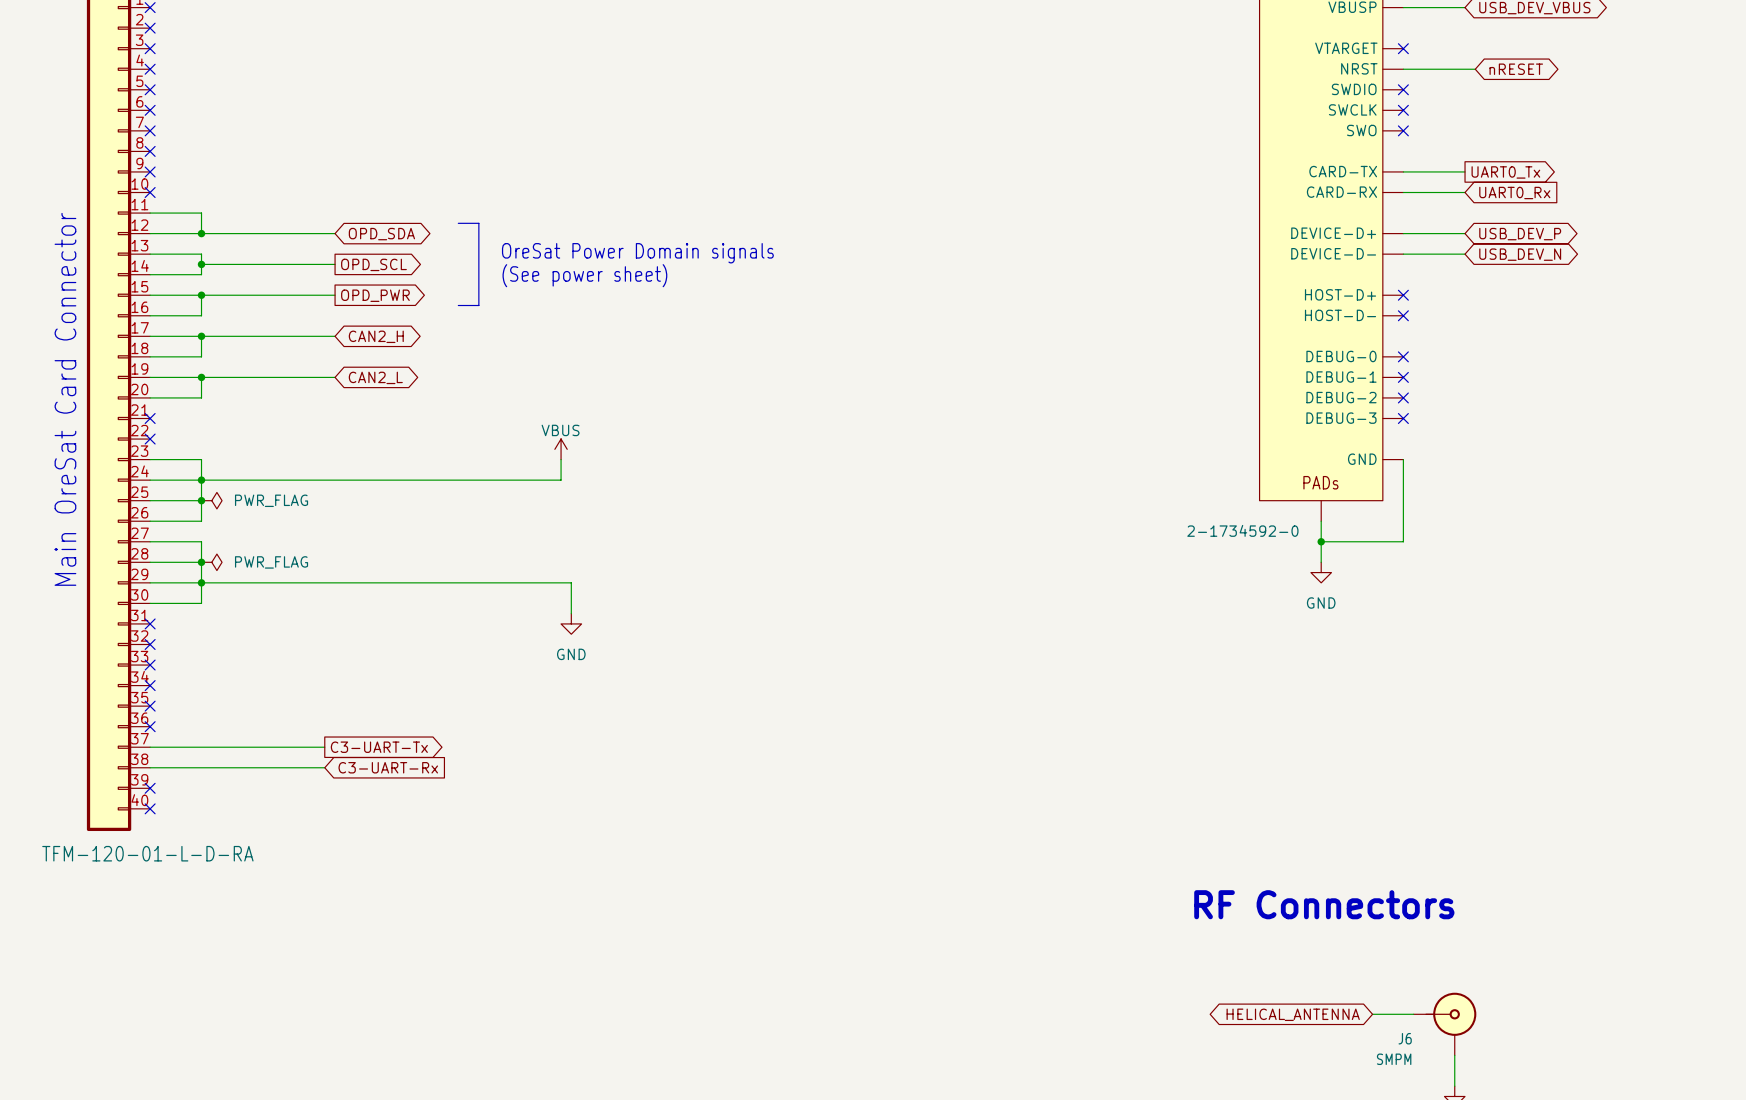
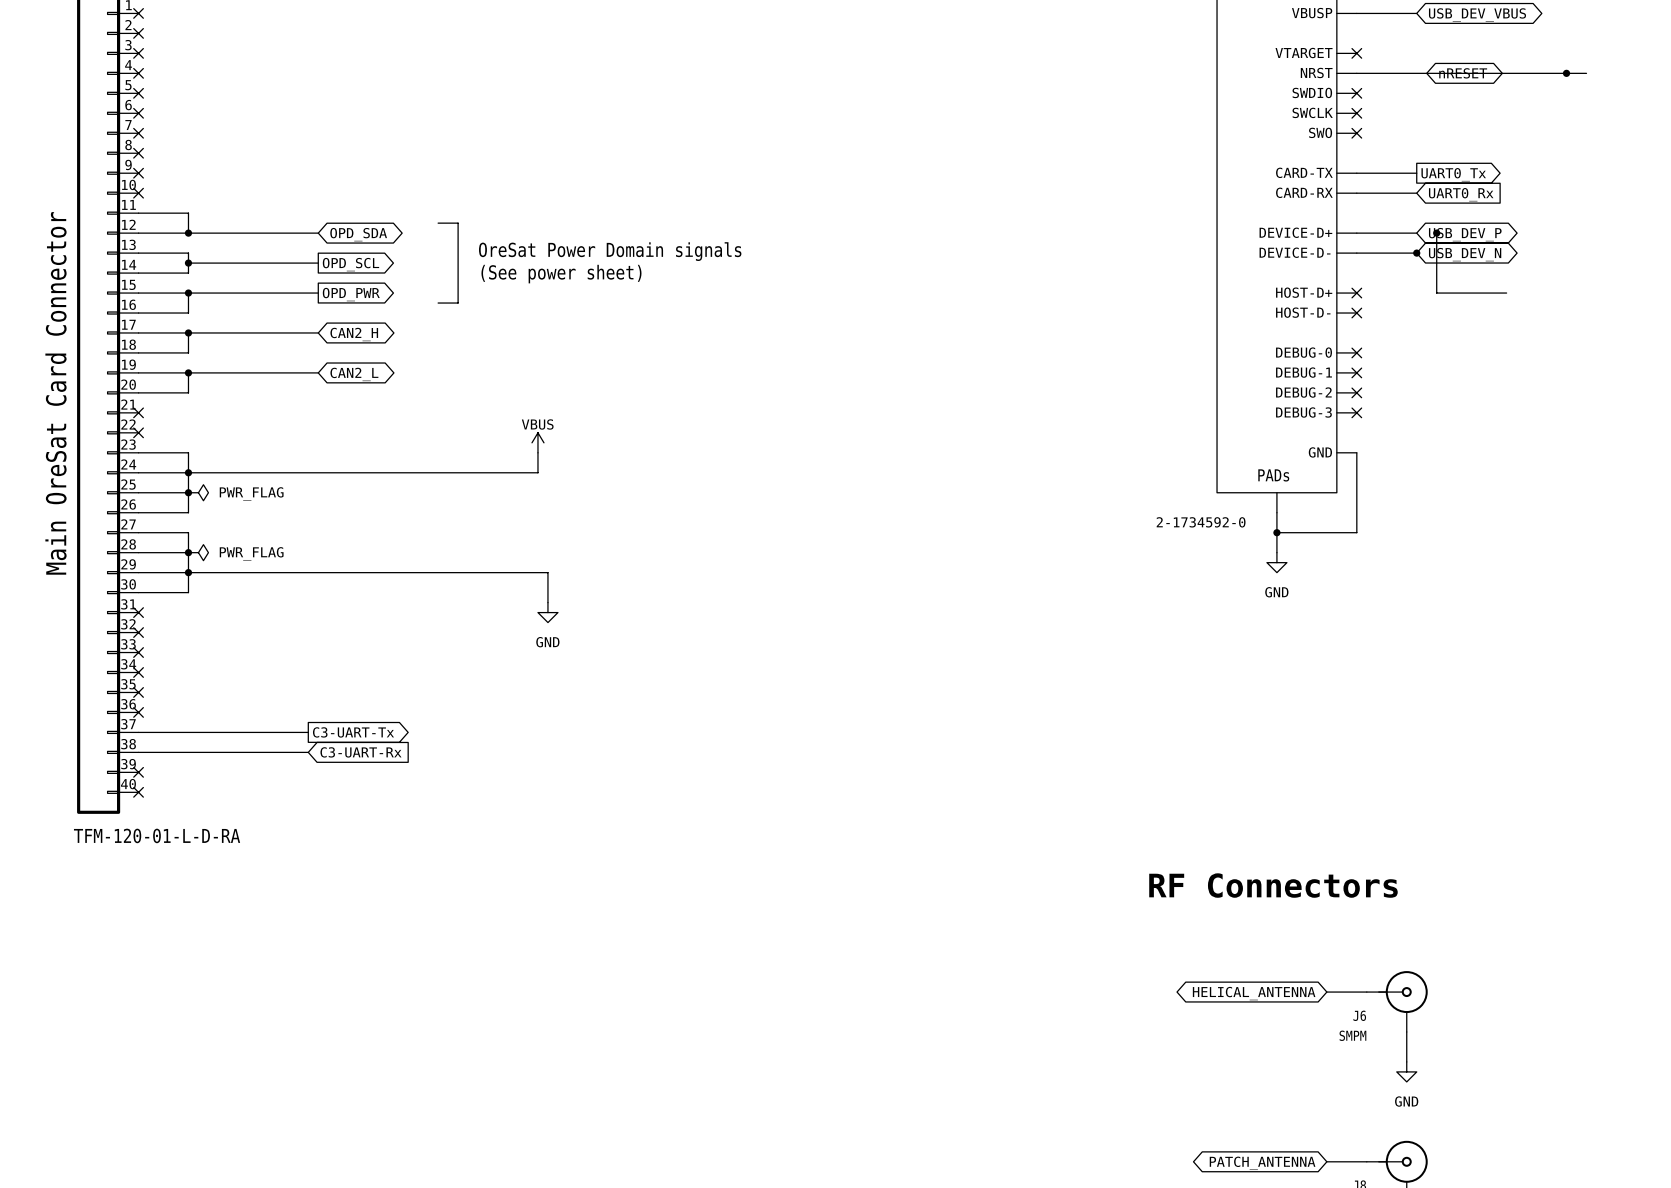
wire: none -> (1426, 73) (1586, 73)
junction: none -> (1566, 73)
wire: none -> (1436, 233) (1436, 293) (1506, 293)
junction: none -> (1436, 233)
junction: none -> (1416, 253)

